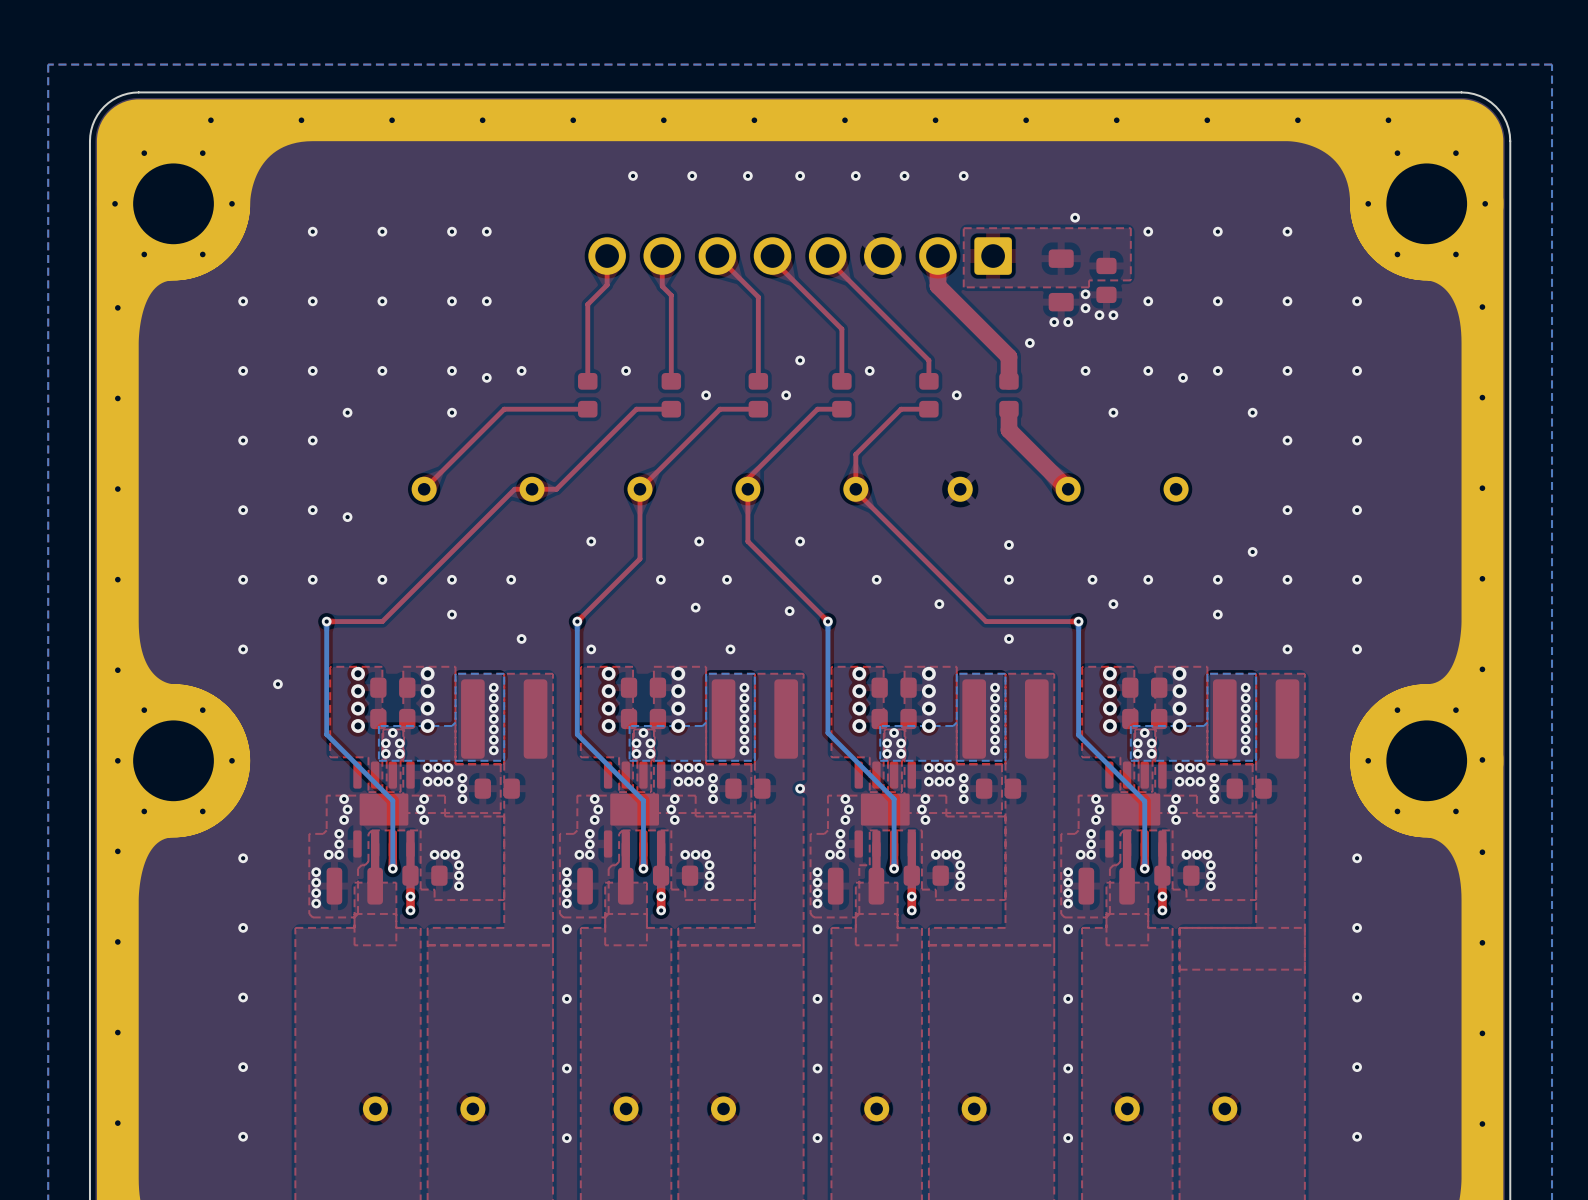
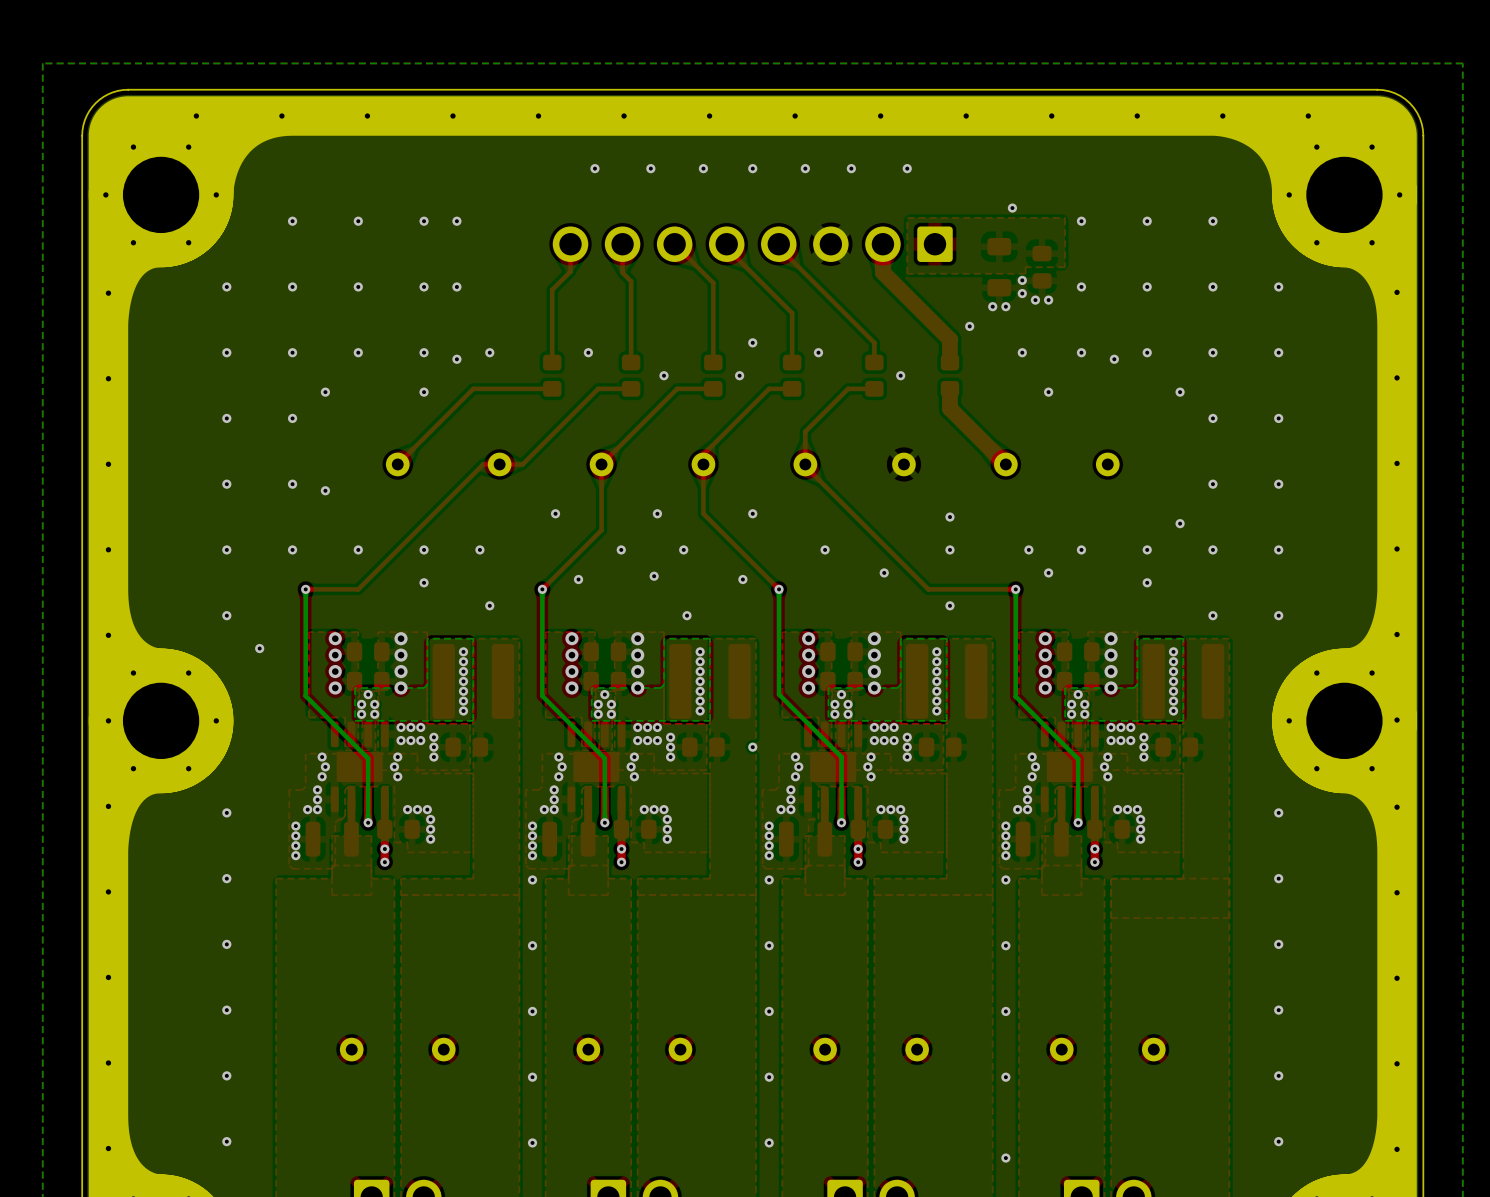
via position: (591, 649) -> (578, 579)

